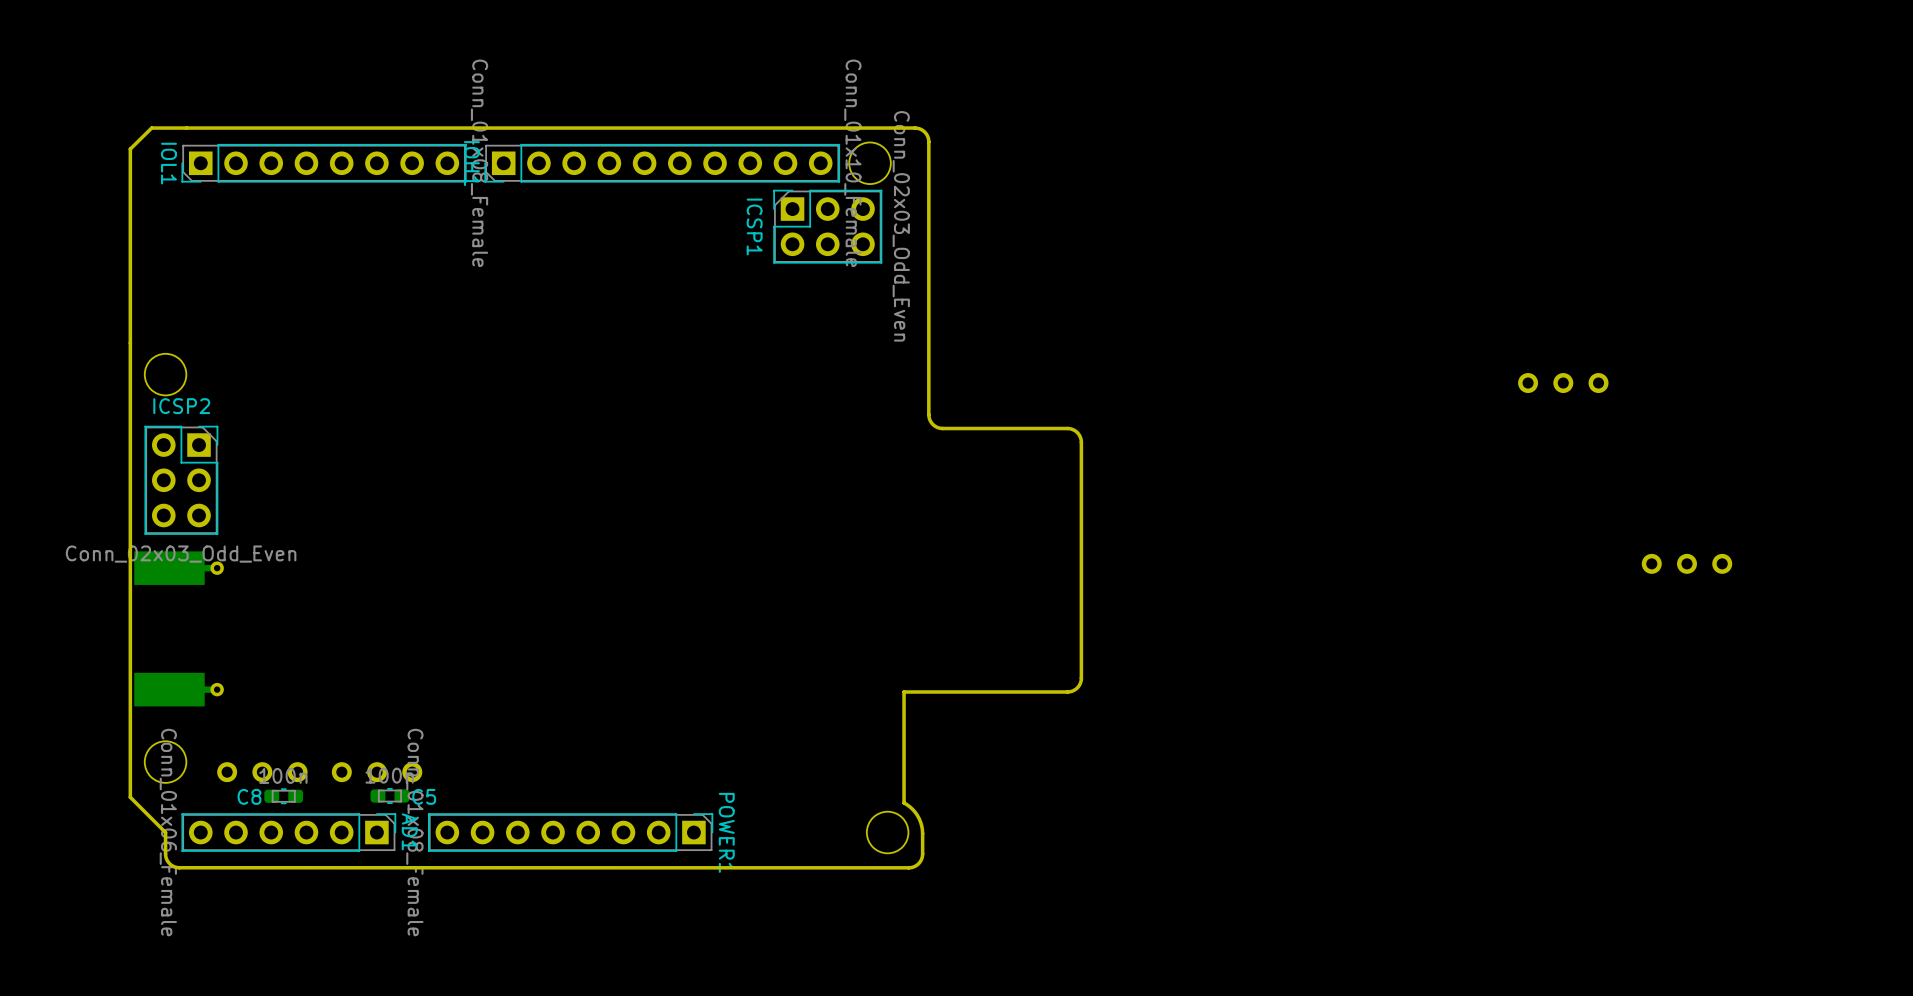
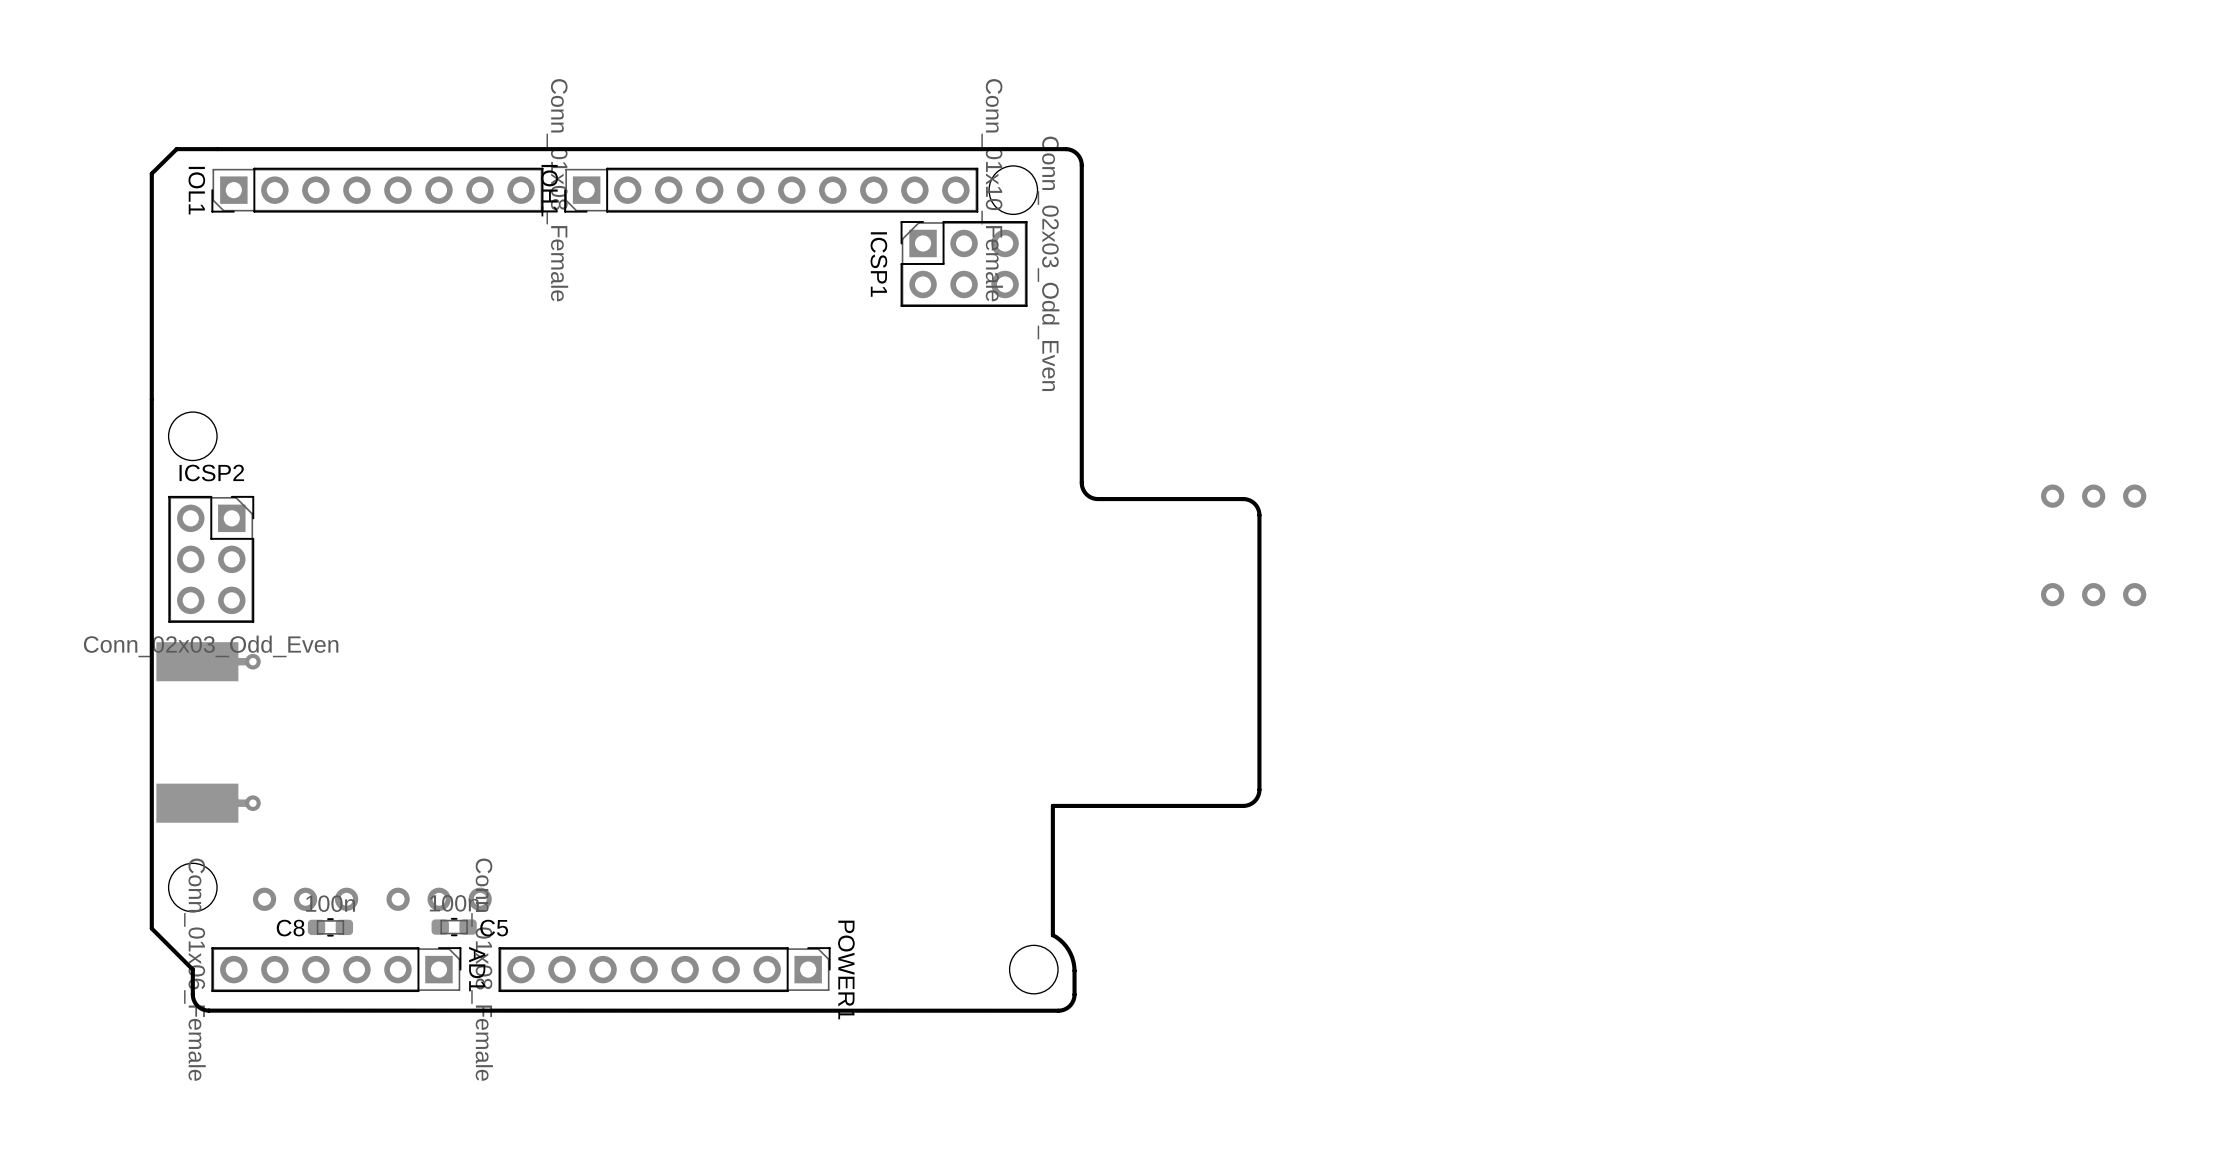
part: (1563, 383) -> none
part: none -> (2093, 496)
part: none -> (2093, 594)
part: (1687, 563) -> none

